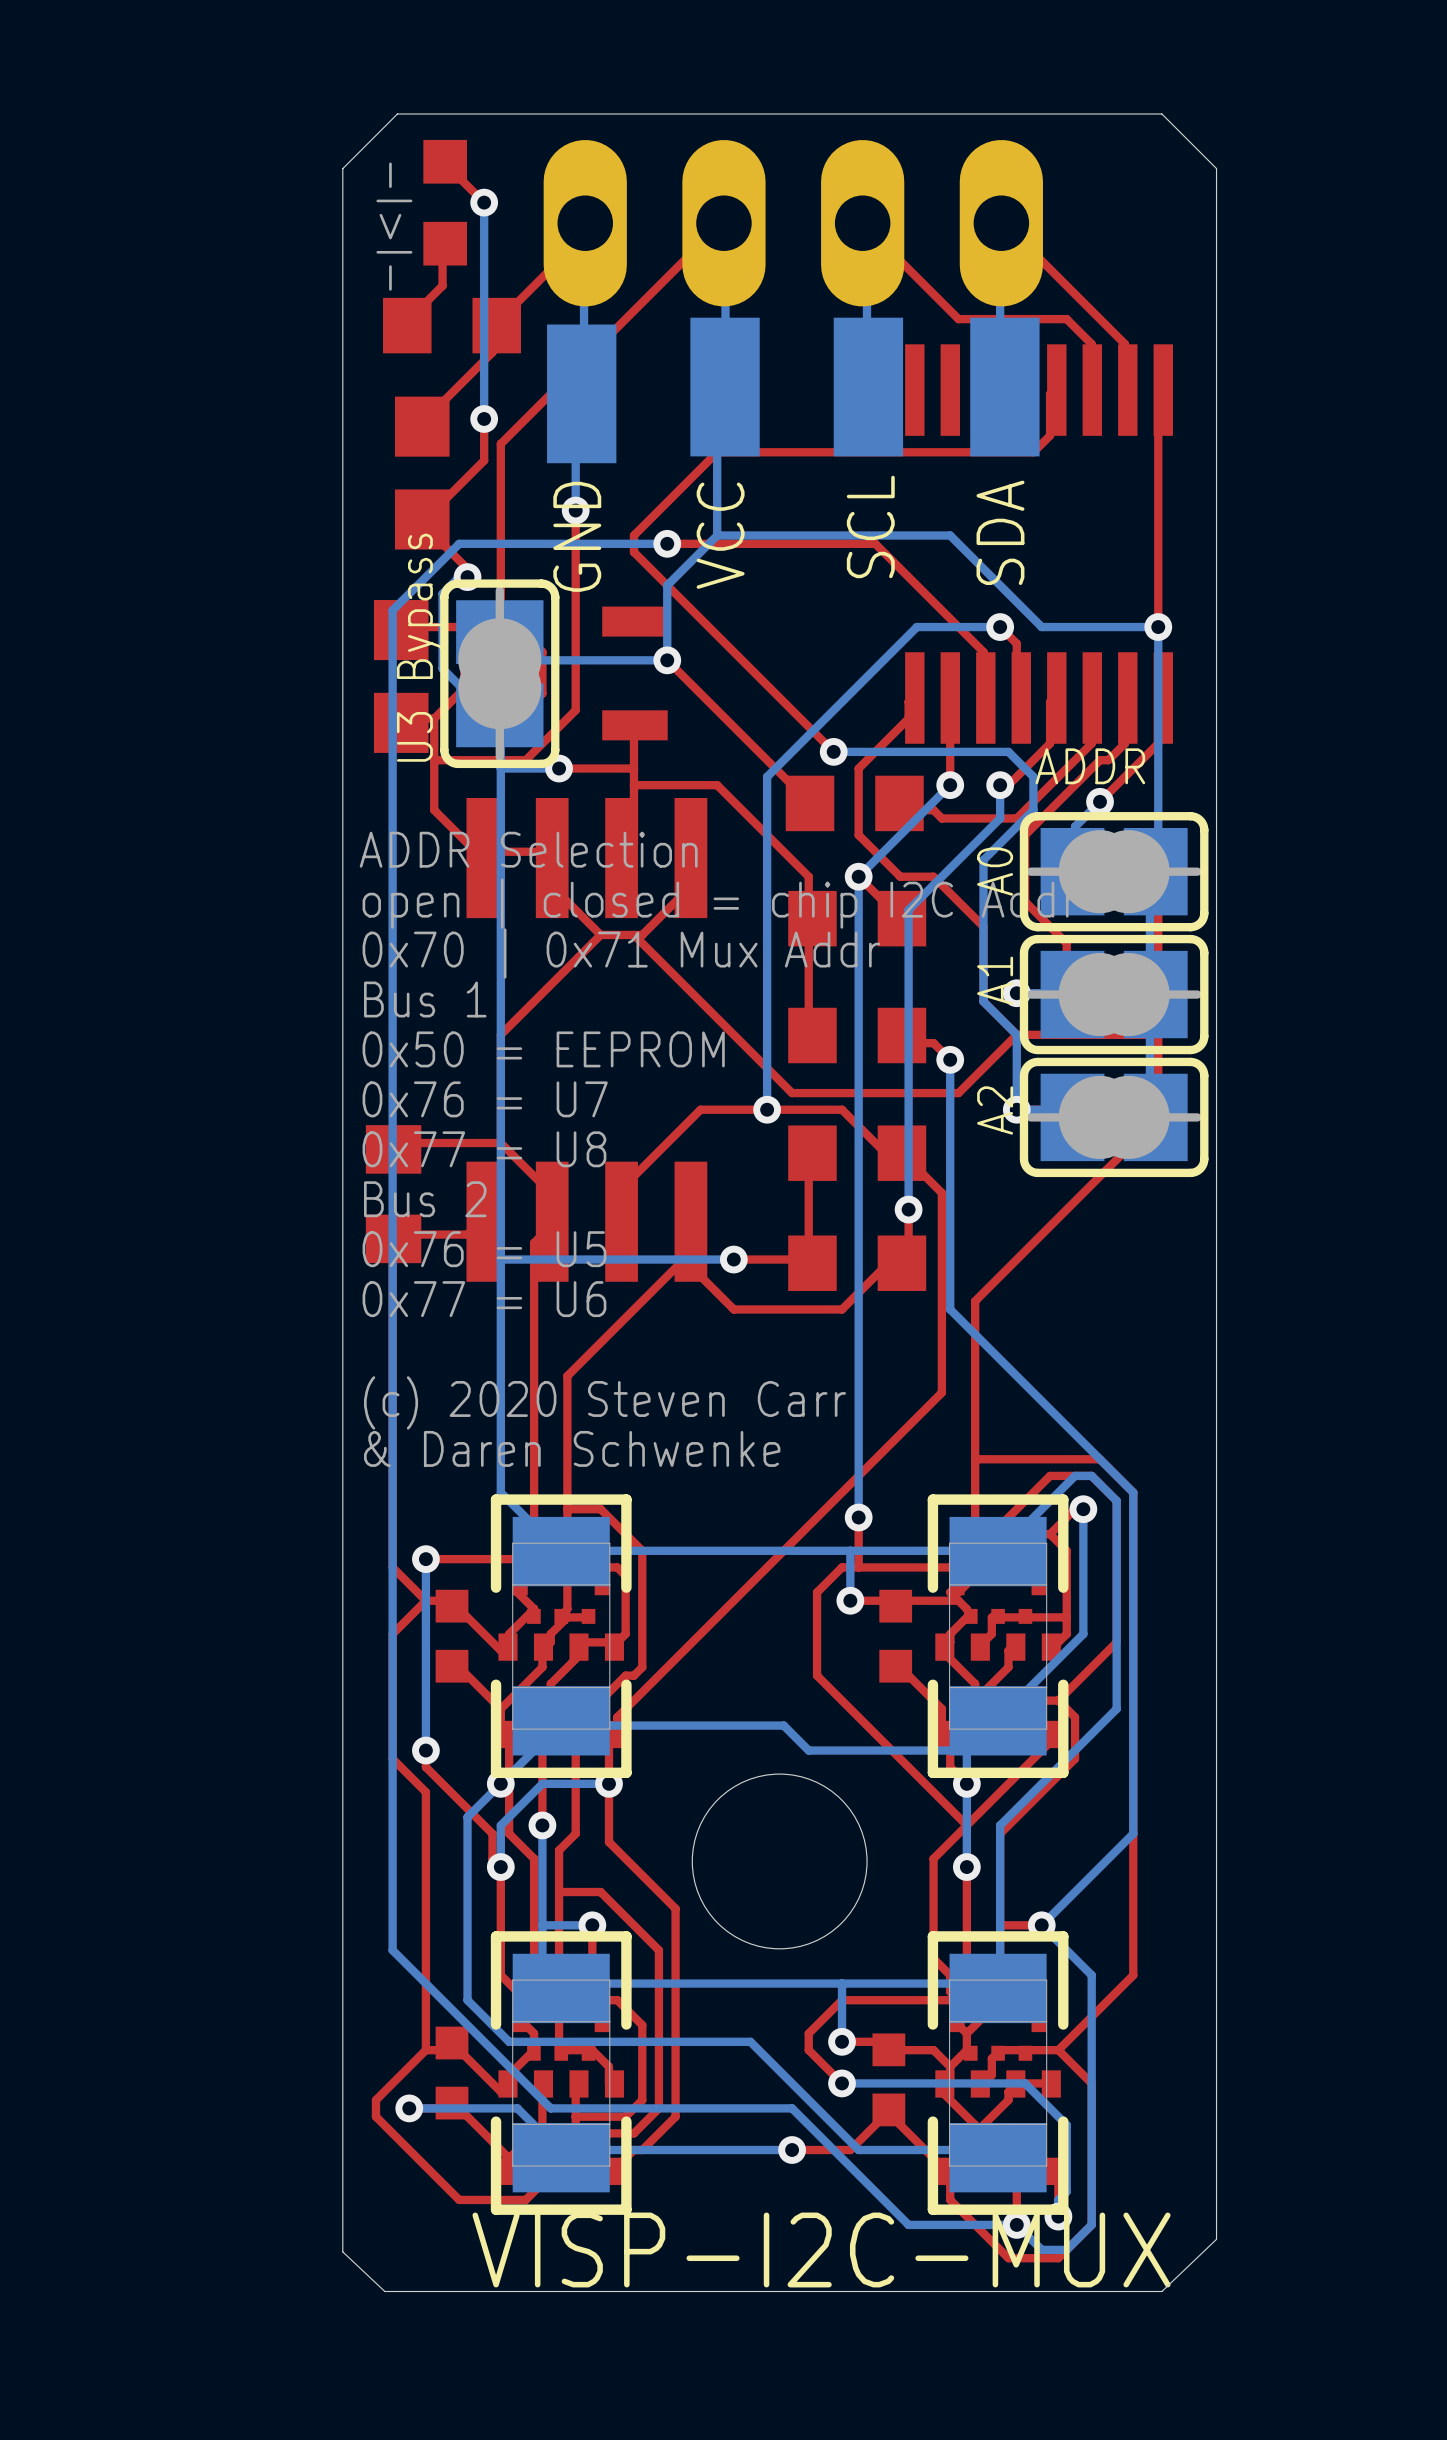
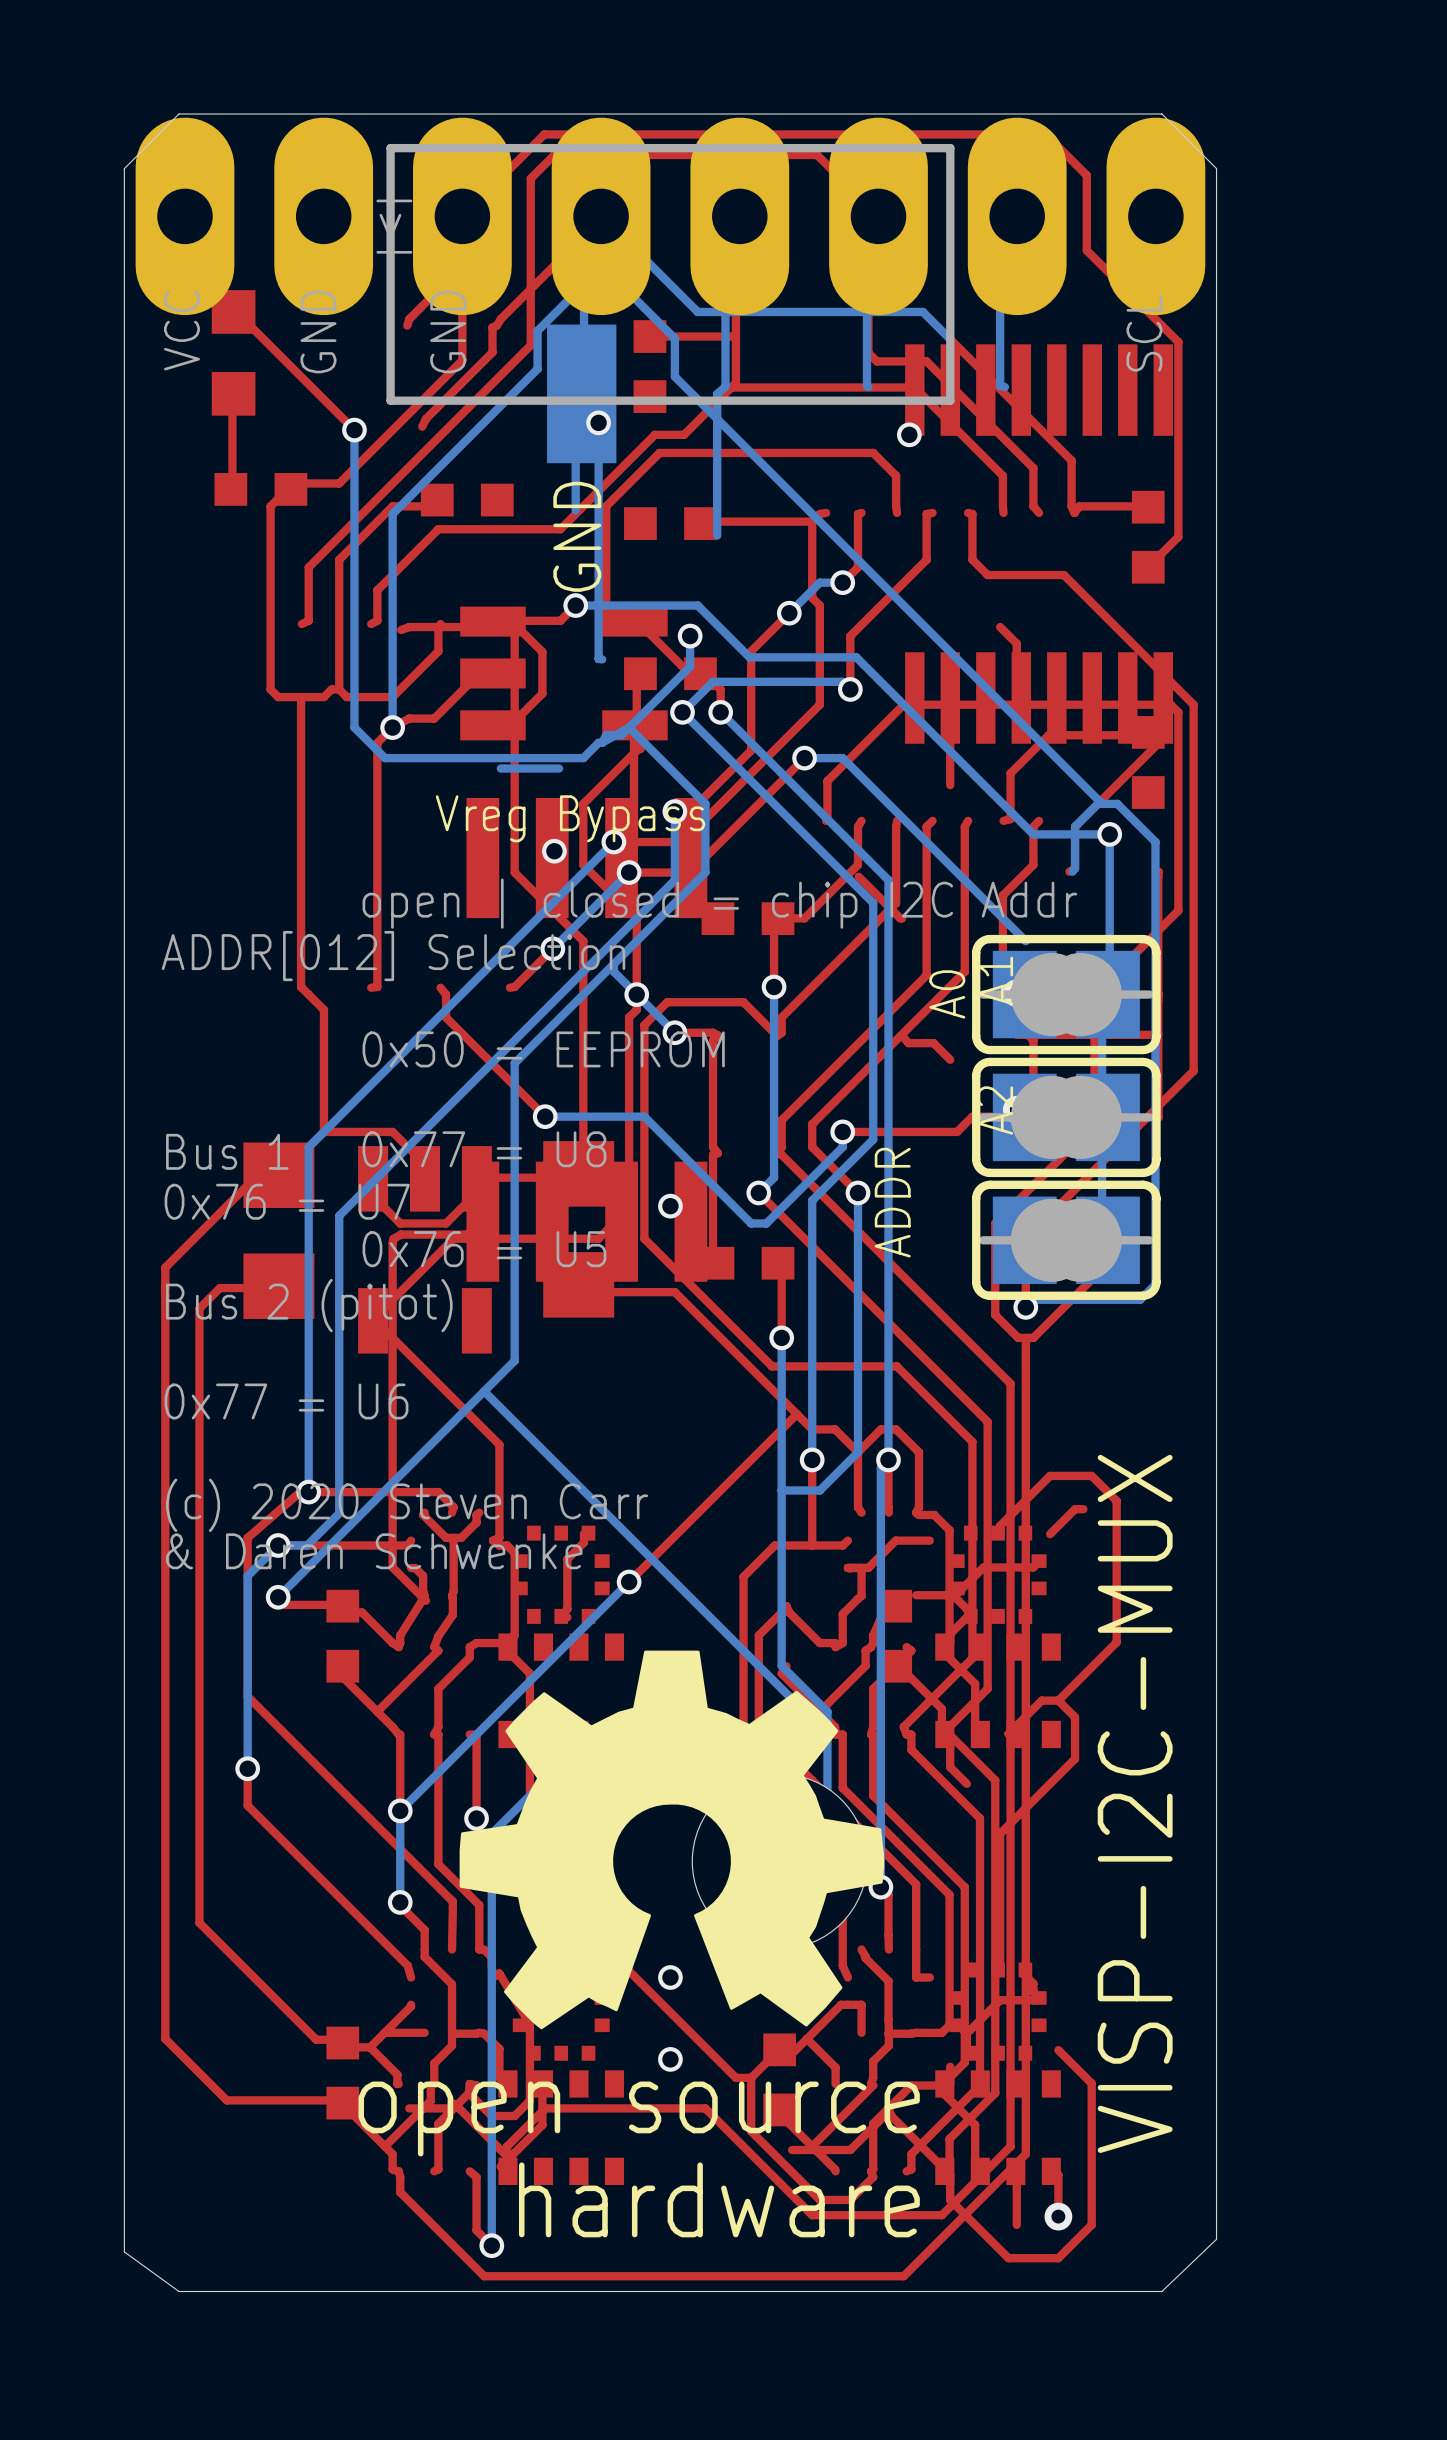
board edge: (397, 114) (342, 168) (342, 2251) (384, 2291) -> (397, 114) (178, 114) (124, 168) (124, 2251) (178, 2291) (384, 2291)
line: none -> (950, 148) (390, 148) (390, 400) (950, 400) (950, 148)
part position: (445, 202) -> (233, 352)
bottom track: (484, 202) (484, 418) -> none
via: (484, 202) -> none
bottom track: none -> (602, 216) (697, 311) (922, 311) (949, 338)
part: none -> (670, 216)
top track: none -> (739, 216) (736, 216) (735, 383) (684, 434) (654, 434) (560, 529) (438, 529) (377, 590) (377, 620) (371, 624)
top track: (723, 223) (717, 227) (500, 443) (500, 618) (492, 621) -> none
part: (793, 223) -> none
top track: (862, 223) (958, 319) (1066, 319) (1091, 344) (1092, 390) -> none
top track: (1001, 223) (1008, 227) (1124, 344) (1124, 385) (1127, 390) -> none
top track: none -> (233, 311) (240, 315) (354, 430)
part: (452, 325) -> none
text: none -> VCC (181, 330)
text: none -> GND (318, 332)
text: none -> GND (448, 332)
text: none -> SCL (1144, 333)
top track: none -> (735, 336) (649, 336)
top track: none -> (949, 338) (1071, 460) (1071, 506) (1074, 512) (1079, 506) (1147, 506)
part: none -> (649, 366)
VCC: (725, 387) -> none
top track: none -> (731, 387) (914, 387) (1002, 475) (1003, 512)
SCL: (868, 387) -> none
SDA: (1004, 387) -> none
top track: (1056, 390) (1050, 394) (1050, 435) (1033, 452) (717, 452) (633, 535) (633, 552) (833, 751) -> none
top track: (1163, 390) (1158, 394) (1158, 627) -> none
top track: none -> (233, 393) (230, 489)
part footprint: [394, 396, 450, 550] -> [420, 483, 514, 517]
top track: (484, 418) (484, 460) (425, 518) (422, 519) (425, 527) (467, 568) (467, 577) -> none
via: (484, 418) -> none
bottom track: none -> (598, 422) (598, 658) (602, 659)
via: none -> (598, 422)
bottom track: none -> (354, 430) (354, 727) (385, 758) (583, 758) (598, 742) (602, 742)
via: none -> (354, 430)
via: none -> (909, 434)
part: none -> (260, 489)
top track: none -> (437, 500) (430, 506) (392, 506) (339, 559) (339, 689)
top track: (575, 510) (575, 710) (525, 760) (434, 760) -> none
via: (575, 510) -> none
top track: none -> (826, 512) (819, 514) (812, 521)
top track: none -> (861, 512) (857, 514) (857, 567) (842, 582)
top track: none -> (897, 512) (896, 475) (873, 452) (659, 452) (606, 506) (606, 613) (621, 628) (644, 628) (682, 666) (697, 666) (700, 673) (705, 674) (720, 689) (720, 712)
top track: none -> (932, 512) (926, 514) (926, 559) (850, 636) (850, 689)
top track: none -> (968, 512) (972, 514) (972, 559) (987, 575) (1063, 575) (1193, 704) (1193, 1070) (1041, 1223) (1041, 1238) (1036, 1240) (1025, 1253) (1025, 1307)
top track: none -> (1039, 512) (1033, 506) (1033, 468) (926, 361) (876, 361) (868, 352) (868, 226) (878, 216) (817, 154) (554, 154) (530, 178) (530, 345) (308, 567) (308, 620) (301, 624)
top track: none -> (812, 521) (812, 597) (819, 605) (819, 704) (682, 842) (613, 842)
top track: none -> (812, 521) (705, 521) (700, 523)
part: none -> (670, 523)
part: none -> (1148, 537)
top track: (667, 543) (875, 543) (983, 652) (983, 693) (985, 698) -> none
bottom track: (667, 543) (459, 543) (392, 610) -> (1025, 1299) (1140, 1299) (1155, 1284) (1155, 842) (1117, 803) (1102, 803) (674, 376) (674, 338) (629, 292) (575, 292) (537, 330) (537, 369) (392, 514) (392, 610)
via: (667, 543) -> none
top track: none -> (1148, 567) (1178, 536) (1178, 342) (1086, 250) (1086, 175) (1045, 134) (544, 134) (462, 216) (462, 360) (339, 483) (293, 483) (290, 489) (285, 491) (270, 506) (270, 689) (278, 697) (323, 697) (331, 689) (339, 689)
bottom track: (467, 577) (459, 577) (442, 593) (442, 668) (492, 718) (499, 715) (500, 718) (500, 1492) (561, 1551) (998, 1551) (1075, 1475) (1091, 1475) (1116, 1500) (1116, 1708) (1000, 1825) (1000, 1983) (998, 1988) (991, 1983) (567, 1983) (561, 1988) (559, 1983) (542, 1966) (542, 1825) -> none
via: (467, 577) -> none
bottom track: none -> (842, 582) (819, 582) (789, 613)
via: none -> (842, 582)
top track: none -> (575, 605) (560, 620) (514, 620) (509, 624) (514, 628) (514, 872) (583, 941) (583, 1170) (575, 1177) (476, 1178) (484, 1185) (446, 1223) (400, 1223) (377, 1200) (377, 1185) (373, 1178)
bottom track: none -> (575, 605) (697, 605) (749, 657) (856, 657) (1033, 834) (1109, 834) (1109, 986) (1107, 994) (1102, 994) (1102, 1116) (1107, 1117) (1102, 1124) (1102, 1238) (1107, 1240)
via: none -> (575, 605)
top track: none -> (789, 613) (751, 651) (751, 750) (690, 811) (674, 811)
via: none -> (789, 613)
top track: none -> (440, 624) (438, 628) (438, 651) (392, 697) (346, 697) (339, 689)
bottom track: (1000, 627) (916, 627) (767, 776) (767, 1109) -> none
via: (1000, 627) -> none
via: (1158, 627) -> none
bottom track: (499, 632) (525, 660) (667, 660) (667, 585) (717, 535) (950, 535) (1041, 627) (1158, 627) (1158, 868) (1149, 876) (1149, 993) (1155, 994) (1149, 1001) (1149, 1109) (1155, 1117) -> none
bottom track: none -> (690, 636) (690, 666) (621, 735) (606, 735) (602, 742)
text: U3 Bypass (420, 647) -> none
top track: (667, 660) (810, 803) -> none
via position: (667, 660) -> (690, 636)
part: (499, 673) -> none
top track: none -> (640, 673) (636, 674) (636, 742) (640, 748) (583, 803) (583, 864) (636, 918) (636, 1009) (629, 1017) (629, 1208) (598, 1238) (453, 1238) (373, 1320) (377, 1322) (499, 1444) (499, 1537) (492, 1540) (499, 1545) (507, 1545) (514, 1553) (514, 1635) (505, 1647)
part: none -> (670, 673)
part: (401, 676) -> none
bottom track: none -> (850, 689) (842, 681) (713, 681) (682, 712) (873, 903) (873, 1139) (812, 1200) (812, 1459)
via: none -> (850, 689)
top track: none -> (301, 697) (301, 986)
top track: (914, 698) (908, 701) (908, 718) (858, 768) (858, 835) (900, 876) (933, 876) (983, 926) (983, 1001) (1016, 1034) (958, 1093) (792, 1093) (633, 934) -> none
top track: (1056, 698) (1050, 701) (1050, 743) (1008, 785) (1000, 785) -> none
top track: (1092, 698) (1091, 743) (1016, 818) (941, 818) (933, 810) (900, 810) (899, 803) -> none
top track: (1127, 698) (1124, 701) (1124, 743) (1108, 760) (1100, 760) (1025, 835) (1025, 901) (1066, 943) (1066, 993) -> none
via: none -> (682, 712)
bottom track: none -> (720, 712) (888, 880) (888, 1459) (880, 1467) (880, 1887)
via: none -> (720, 712)
top track: (434, 718) (434, 810) (482, 858) (484, 851) (550, 851) (552, 858) (559, 860) (559, 893) (600, 934) -> none
top track: none -> (392, 727) (377, 742) (377, 986) (371, 987)
bottom track: (392, 727) (392, 1950) (550, 2108) (792, 2108) (908, 2224) (1016, 2224) (1041, 2249) (1066, 2249) (1091, 2224) (1091, 1975) (1041, 1925) (1133, 1833) (1133, 1492) (950, 1309) (950, 1059) -> none
via: none -> (392, 727)
top track: none -> (1148, 732) (1147, 735) (1048, 735) (1010, 773) (1010, 819) (1003, 820)
bottom track: none -> (602, 742) (629, 727) (705, 803) (705, 872) (514, 1063) (514, 1360) (278, 1597)
bottom track: (833, 751) (1008, 751) (1033, 776) (1033, 810) (983, 860) (983, 1001) (1016, 1034) (1016, 1109) (1066, 1109) (1072, 1117) -> none
via: (833, 751) -> none
top track: none -> (804, 758) (690, 872) (629, 872)
bottom track: none -> (804, 758) (842, 758) (1025, 941)
via: none -> (804, 758)
part: none -> (1148, 762)
text rotation: 0° (1090, 766) -> 90° counterclockwise (892, 1202)
text position: ADDR (1090, 766) -> ADDR (892, 1202)
via: (559, 768) -> none
top track: (633, 768) (559, 768) -> none
top track: (633, 785) (717, 785) (808, 876) (808, 918) (812, 918) (808, 926) (808, 1034) (812, 1035) -> none
bottom track: (950, 785) (858, 876) (858, 1517) -> none
via: (950, 785) -> none
bottom track: (1000, 785) (1000, 818) (908, 910) (908, 1209) -> none
via: (1000, 785) -> none
via: (1100, 801) -> none
part: (854, 803) -> none
bottom track: none -> (674, 811) (674, 880) (339, 1215) (339, 1513) (307, 1545) (278, 1545) (247, 1576) (247, 1768)
via: none -> (674, 811)
text: none -> Vreg Bypass (570, 818)
top track: none -> (826, 820) (827, 781) (903, 704) (1170, 704) (1178, 712) (1178, 910) (1094, 994) (1094, 1116) (1096, 1117) (1094, 1124) (995, 1223) (995, 1315) (1018, 1337) (1033, 1337) (1094, 1276) (1094, 1246) (1096, 1240)
top track: none -> (861, 820) (857, 826) (857, 864) (804, 918) (778, 918) (774, 925) (774, 986)
top track: none -> (897, 820) (896, 903) (781, 1017) (781, 1032) (778, 1035) (774, 1032) (743, 1002) (667, 1002) (644, 1025) (644, 1238) (772, 1366) (896, 1366) (972, 1441) (972, 1658) (903, 1726) (906, 1734) (911, 1734) (911, 1749) (980, 1818) (980, 2085) (911, 2154) (911, 2169) (906, 2171)
top track: none -> (932, 820) (926, 826) (926, 975) (781, 1120) (781, 1147) (778, 1153) (1010, 1383) (1010, 2146) (941, 2215) (812, 2215) (705, 2108) (545, 2108) (507, 2146) (507, 2169) (505, 2171)
top track: none -> (968, 820) (964, 826) (964, 971) (812, 1124) (812, 1147) (857, 1192)
top track: none -> (1039, 820) (1033, 826) (1033, 864) (1002, 895) (1002, 1009) (1033, 1040) (1033, 1116)
via: none -> (1109, 834)
bottom track: none -> (613, 842) (308, 1147) (308, 1492)
via: none -> (613, 842)
text: ADDR Selection (528, 849) -> none
via: none -> (554, 851)
top track: (690, 858) (683, 860) (683, 893) (642, 934) (600, 934) -> none
text position: A0 (995, 871) -> A0 (947, 994)
part: (1114, 871) -> none
bottom track: none -> (629, 872) (552, 948)
via: none -> (629, 872)
via: (858, 876) -> none
part: none -> (747, 918)
part: (857, 918) -> none
top track: (600, 934) (500, 1034) (500, 1143) -> none
top track: none -> (552, 948) (514, 986) (509, 987)
via: none -> (552, 948)
text: 0x70 | 0x71 Mux Addr (621, 953) -> none
text: none -> ADDR[012] Selection (393, 956)
bottom track: none -> (613, 964) (613, 971) (674, 1032)
bottom track: none -> (774, 986) (774, 1177) (758, 1192)
via: none -> (774, 986)
top track: none -> (301, 987) (323, 1009) (323, 1131)
top track: none -> (440, 987) (446, 994) (446, 1017) (545, 1116)
via: none -> (636, 994)
part position: (1114, 994) -> (1066, 994)
text position: Bus 1 (425, 999) -> Bus 1 (227, 1151)
top track: none -> (674, 1032) (713, 1032) (717, 1035) (713, 1040) (713, 1147) (717, 1153) (713, 1154) (713, 1261) (717, 1263)
via: none -> (674, 1032)
part: (857, 1035) -> none
via: (950, 1059) -> none
text position: 0x76 = U7 (485, 1099) -> 0x76 = U7 (287, 1201)
via: (767, 1109) -> none
bottom track: none -> (545, 1116) (644, 1116) (751, 1223) (766, 1223) (842, 1147) (842, 1131)
via: none -> (545, 1116)
top track: none -> (1033, 1116) (972, 1116) (957, 1131) (842, 1131)
part position: (1114, 1117) -> (1066, 1117)
top track: (1158, 1118) (975, 1301) (975, 1525) (970, 1533) -> none
top track: none -> (323, 1131) (392, 1131) (423, 1162) (423, 1177) (424, 1178)
top track: none -> (323, 1131) (278, 1177) (255, 1177) (165, 1267) (165, 2038) (226, 2100) (338, 2100)
via: none -> (842, 1131)
top track: (500, 1143) (400, 1143) (393, 1149) -> none
top track: (500, 1143) (550, 1192) (550, 1226) (534, 1242) (533, 1533) -> none
top track: (812, 1153) (808, 1159) (808, 1259) -> none
part: (857, 1153) -> none
top track: none -> (758, 1192) (987, 1421) (987, 1688) (942, 1734) (949, 1734) (995, 1780) (995, 2093) (949, 2138) (949, 2169) (942, 2171)
via: none -> (758, 1192)
bottom track: none -> (857, 1192) (857, 1452) (819, 1490) (781, 1490)
via: none -> (857, 1192)
part: (393, 1194) -> none
text: Bus 2 (425, 1199) -> none
via: none -> (670, 1206)
top track: (908, 1209) (908, 1259) (901, 1263) (900, 1267) (883, 1267) (842, 1309) (733, 1309) (683, 1259) -> none
via: (908, 1209) -> none
top track: (621, 1221) (625, 1217) (625, 1184) (700, 1109) (842, 1109) (883, 1151) (900, 1151) (941, 1192) (941, 1392) (617, 1717) (617, 1733) (614, 1734) (609, 1742) (609, 1842) (675, 1908) (675, 2116) (642, 2150) (633, 2150) (614, 2171) -> none
part: none -> (578, 1229)
part: none -> (278, 1230)
part: none -> (1066, 1240)
part: none -> (424, 1249)
top track: (683, 1259) (567, 1376) (567, 1525) (561, 1533) -> none
bottom track: (733, 1259) (500, 1259) -> none
via: (733, 1259) -> none
top track: (808, 1259) (733, 1259) -> none
part: none -> (747, 1263)
top track: none -> (778, 1263) (781, 1269) (781, 1337)
part: (857, 1263) -> none
top track: none -> (578, 1284) (583, 1292) (674, 1292) (812, 1429) (835, 1429) (857, 1452)
top track: none -> (278, 1286) (219, 1288) (199, 1308) (199, 1922) (316, 2039) (339, 2039) (346, 2047) (370, 2047)
text position: 0x77 = U6 (484, 1299) -> 0x77 = U6 (286, 1401)
text: none -> Bus 2 (pitot) (309, 1305)
via: none -> (1025, 1307)
bottom track: none -> (781, 1337) (781, 1665) (827, 1711) (827, 1795) (804, 1818) (774, 1818) (713, 1757) (568, 1757) (491, 1833) (491, 2245)
via: none -> (781, 1337)
top track: none -> (1025, 1337) (1025, 2154) (903, 2276) (484, 2276) (400, 2192) (398, 2171) (392, 2169) (392, 2154) (339, 2100)
bottom track: none -> (484, 1391) (796, 1704) (796, 1787)
text position: (c) 2020 Steven Carr (605, 1402) -> (c) 2020 Steven Carr (407, 1505)
top track: none -> (796, 1414) (629, 1582)
text position: & Daren Schwenke (572, 1448) -> & Daren Schwenke (374, 1551)
top track: none -> (857, 1452) (857, 1507) (861, 1512)
top track: none -> (857, 1452) (880, 1429) (896, 1429) (919, 1452) (919, 1507) (916, 1512) (919, 1514) (934, 1514) (949, 1530) (949, 1643) (942, 1647)
top track: none -> (812, 1459) (812, 1545)
via: none -> (812, 1459)
top track: none -> (888, 1459) (888, 1512)
via: none -> (888, 1459)
top track: (975, 1459) (1100, 1459) (1133, 1492) (1133, 1975) (1058, 2050) (1000, 2050) (991, 2058) (991, 2075) (980, 2083) -> none
via: none -> (308, 1492)
top track: (567, 1509) (600, 1509) (642, 1550) (642, 1667) (633, 1675) (625, 1675) (584, 1717) (584, 1733) (578, 1734) (575, 1742) (575, 1833) (559, 1850) (559, 1966) (561, 1969) -> none
bottom track: (1083, 1509) (1083, 1634) (998, 1720) -> none
via: (1083, 1509) -> none
top track: none -> (452, 1512) (453, 1507) (438, 1492) (300, 1492) (247, 1537) (247, 1696) (452, 1901) (452, 1949)
top track: none -> (479, 1512) (476, 1514) (476, 1522) (461, 1537) (446, 1537) (423, 1514) (424, 1512)
top track: (858, 1517) (858, 1567) -> none
via: (858, 1517) -> none
top track: (1025, 1534) (1050, 1534) (1066, 1550) (1066, 1634) (1051, 1647) -> none
top track: none -> (453, 1537) (452, 1614) (438, 1636) (434, 1647) (438, 1650) (377, 1711)
top track: none -> (411, 1540) (407, 1545) (278, 1545)
top track: none -> (847, 1540) (842, 1545) (774, 1545) (743, 1576) (743, 1772) (842, 1871) (842, 1965) (847, 1977)
top track: none -> (929, 1540) (895, 1540) (868, 1567) (847, 1567) (850, 1568)
via: none -> (278, 1545)
bottom track: (850, 1550) (850, 1600) -> none
top track: (425, 1559) (517, 1559) (520, 1561) -> none
bottom track: (425, 1559) (425, 1750) -> none
via: (425, 1559) -> none
top track: (602, 1561) (609, 1567) (617, 1567) (625, 1575) (625, 1634) (614, 1647) (609, 1642) (584, 1642) (578, 1647) (584, 1650) (550, 1683) (550, 1733) (543, 1734) (542, 1742) (542, 1825) -> none
top track: (957, 1561) (950, 1567) (842, 1567) (817, 1592) (817, 1675) (966, 1825) -> none
top track: none -> (411, 1567) (415, 1568) (423, 1576) (424, 1595) (400, 1635) (398, 1647) (362, 1612) (346, 1612) (342, 1606) (339, 1604) (285, 1604) (278, 1597)
top track: none -> (861, 1567) (861, 1595) (842, 1614) (842, 1643) (835, 1647) (835, 1643) (819, 1643) (789, 1612) (786, 1606) (758, 1635) (758, 1726) (916, 1884) (916, 1977) (929, 1977)
bottom track: none -> (629, 1582) (400, 1810) (400, 1902)
via: none -> (629, 1582)
top track: (520, 1588) (517, 1592) (534, 1609) -> none
top track: none -> (949, 1595) (916, 1595)
via: none -> (278, 1597)
top track: none -> (889, 1598) (873, 1635) (873, 1643) (865, 1650) (865, 1665) (819, 1711)
via: (850, 1600) -> none
top track: (958, 1600) (900, 1600) (895, 1606) (891, 1600) (850, 1600) -> none
top track: (534, 1609) (509, 1634) (507, 1647) (500, 1650) (459, 1609) (452, 1606) (450, 1600) (425, 1600) (392, 1634) (392, 1758) (425, 1792) (425, 2050) -> none
top track: (588, 1616) (567, 1617) (550, 1634) (550, 1642) (543, 1647) (542, 1650) (542, 1667) (500, 1708) -> none
top track: (1066, 1617) (991, 1617) (991, 1634) (980, 1647) -> none
part position: (452, 1636) -> (342, 1636)
part: (561, 1636) -> none
part: (998, 1636) -> none
top track: none -> (505, 1647) (499, 1643) (476, 1643) (469, 1647) (469, 1657) (438, 1688) (438, 1726) (434, 1734) (438, 1734) (438, 1864) (479, 1905) (479, 1949) (484, 1949) (491, 1957) (492, 1977) (499, 1973) (529, 2024) (529, 2100) (514, 2116) (491, 2116) (468, 2093) (469, 2083) (476, 2085) (438, 2123) (438, 2169) (434, 2171)
top track: none -> (505, 1647) (529, 1673) (529, 1871) (735, 2077) (751, 2077)
top track: none -> (906, 1647) (911, 1650) (873, 1688) (873, 1726) (871, 1734) (873, 1734) (873, 1795) (964, 1887) (964, 2062) (941, 2085) (911, 2085) (873, 2123) (873, 2169) (871, 2171) (873, 2177) (850, 2199) (819, 2199) (751, 2131) (751, 2077)
top track: (1015, 1647) (1008, 1650) (1008, 1667) (975, 1700) -> none
drawing: none -> [459, 1650, 885, 2030]
top track: none -> (342, 1666) (339, 1673) (400, 1734) (400, 1810)
top track: (452, 1666) (459, 1667) (500, 1708) -> none
top track: none -> (786, 1666) (781, 1673) (835, 1726) (835, 1734) (842, 1734) (842, 1787) (949, 1894) (949, 2025) (941, 2032) (888, 2033)
top track: (500, 1708) (500, 1733) (507, 1734) (509, 1742) (509, 1833) (534, 1858) (534, 1975) (559, 2000) (559, 2050) (561, 2053) (567, 2050) (584, 2050) (588, 2053) (592, 2050) (609, 2066) (609, 2083) (614, 2083) -> none
top track: none -> (469, 1734) (476, 1734) (476, 1818)
top track: (1051, 1734) (1050, 1742) (933, 1858) (933, 1958) (950, 1975) (950, 1991) (957, 1997) (950, 2000) (842, 2000) (808, 2033) (808, 2050) (842, 2083) -> none
top track: (425, 1750) (425, 1767) (492, 1833) (492, 1858) (500, 1867) (500, 1975) (517, 1991) (520, 1997) -> none
via: (425, 1750) -> none
bottom track: (966, 1750) (966, 1867) -> none
bottom track: (966, 1750) (808, 1750) (783, 1725) (567, 1725) (561, 1720) (559, 1725) (467, 1817) (467, 2000) (509, 2041) (750, 2041) (858, 2150) (991, 2150) (998, 2157) -> none
top track: none -> (247, 1768) (247, 1805) (407, 1965) (411, 1977)
via: none -> (247, 1768)
via: (500, 1783) -> none
bottom track: (609, 1783) (542, 1783) (500, 1825) (500, 1867) -> none
via: (609, 1783) -> none
via: (966, 1783) -> none
via: none -> (400, 1810)
via: none -> (476, 1818)
via: (542, 1825) -> none
via: (500, 1867) -> none
top track: (966, 1867) (966, 1966) (970, 1969) -> none
via: (966, 1867) -> none
top track: none -> (880, 1887) (888, 1894) (888, 1949)
via: none -> (880, 1887)
top track: (559, 1892) (600, 1892) (658, 1950) (658, 2108) (633, 2133) (609, 2133) (584, 2158) (584, 2166) (578, 2171) -> none
top track: none -> (400, 1902) (400, 1905) (424, 1930) (424, 1957) (452, 1984) (452, 2045) (434, 2063) (434, 2083) (430, 2085) (430, 2100) (385, 2146)
via: none -> (400, 1902)
top track: (592, 1925) (592, 1966) (584, 1975) (600, 1991) (602, 1997) (617, 2000) (642, 2025) (642, 2100) (625, 2116) (575, 2116) -> none
bottom track: (592, 1925) (542, 1925) -> none
via: (592, 1925) -> none
top track: (1041, 1925) (1000, 1925) -> none
via: (1041, 1925) -> none
top track: none -> (861, 1949) (865, 1958) (888, 1981) (888, 2045) (873, 2061) (873, 2077) (871, 2083) (873, 2085) (812, 2146)
via: none -> (670, 1977)
bottom track: (842, 1983) (842, 2041) -> none
top track: none -> (411, 2004) (370, 2047)
top track: (520, 2025) (525, 2025) (534, 2033) (534, 2050) (509, 2075) (509, 2083) (500, 2091) (452, 2043) (450, 2050) (425, 2050) -> none
top track: none -> (424, 2032) (384, 2032)
top track: none -> (861, 2032) (861, 2004) (841, 2004) (790, 2055) (781, 2055) (779, 2049) (751, 2077)
top track: none -> (453, 2033) (484, 2033) (499, 2048) (499, 2077) (505, 2083)
top track: none -> (806, 2038) (835, 2067) (835, 2083)
top track: (842, 2041) (883, 2041) (888, 2049) (933, 2050) (950, 2066) (966, 2050) (970, 2053) -> none
via: (842, 2041) -> none
top track: none -> (370, 2047) (397, 2074) (398, 2083)
top track: (425, 2050) (375, 2100) (375, 2116) (459, 2199) (525, 2199) (550, 2174) (543, 2171) (542, 2166) (575, 2133) (575, 2091) (578, 2083) -> none
via: none -> (670, 2059)
part position: (452, 2073) -> (342, 2073)
part: (561, 2073) -> none
part: (998, 2073) -> none
part position: (888, 2079) -> (779, 2079)
bottom track: (842, 2083) (1025, 2083) (1066, 2125) (1066, 2191) (1058, 2199) (1058, 2216) -> none
via: (842, 2083) -> none
top track: (1051, 2083) (1015, 2083) (1008, 2091) (1008, 2100) (975, 2133) -> none
bottom track: (409, 2108) (517, 2108) (559, 2150) (561, 2157) (567, 2150) (792, 2150) -> none
via: (409, 2108) -> none
top track: none -> (779, 2109) (781, 2116) (835, 2171)
via: (792, 2150) -> none
top track: none -> (469, 2171) (476, 2177) (476, 2230) (491, 2245)
via: (1016, 2224) -> none
via: none -> (491, 2245)
text rotation: 0° (821, 2249) -> 90° counterclockwise (1135, 1803)

